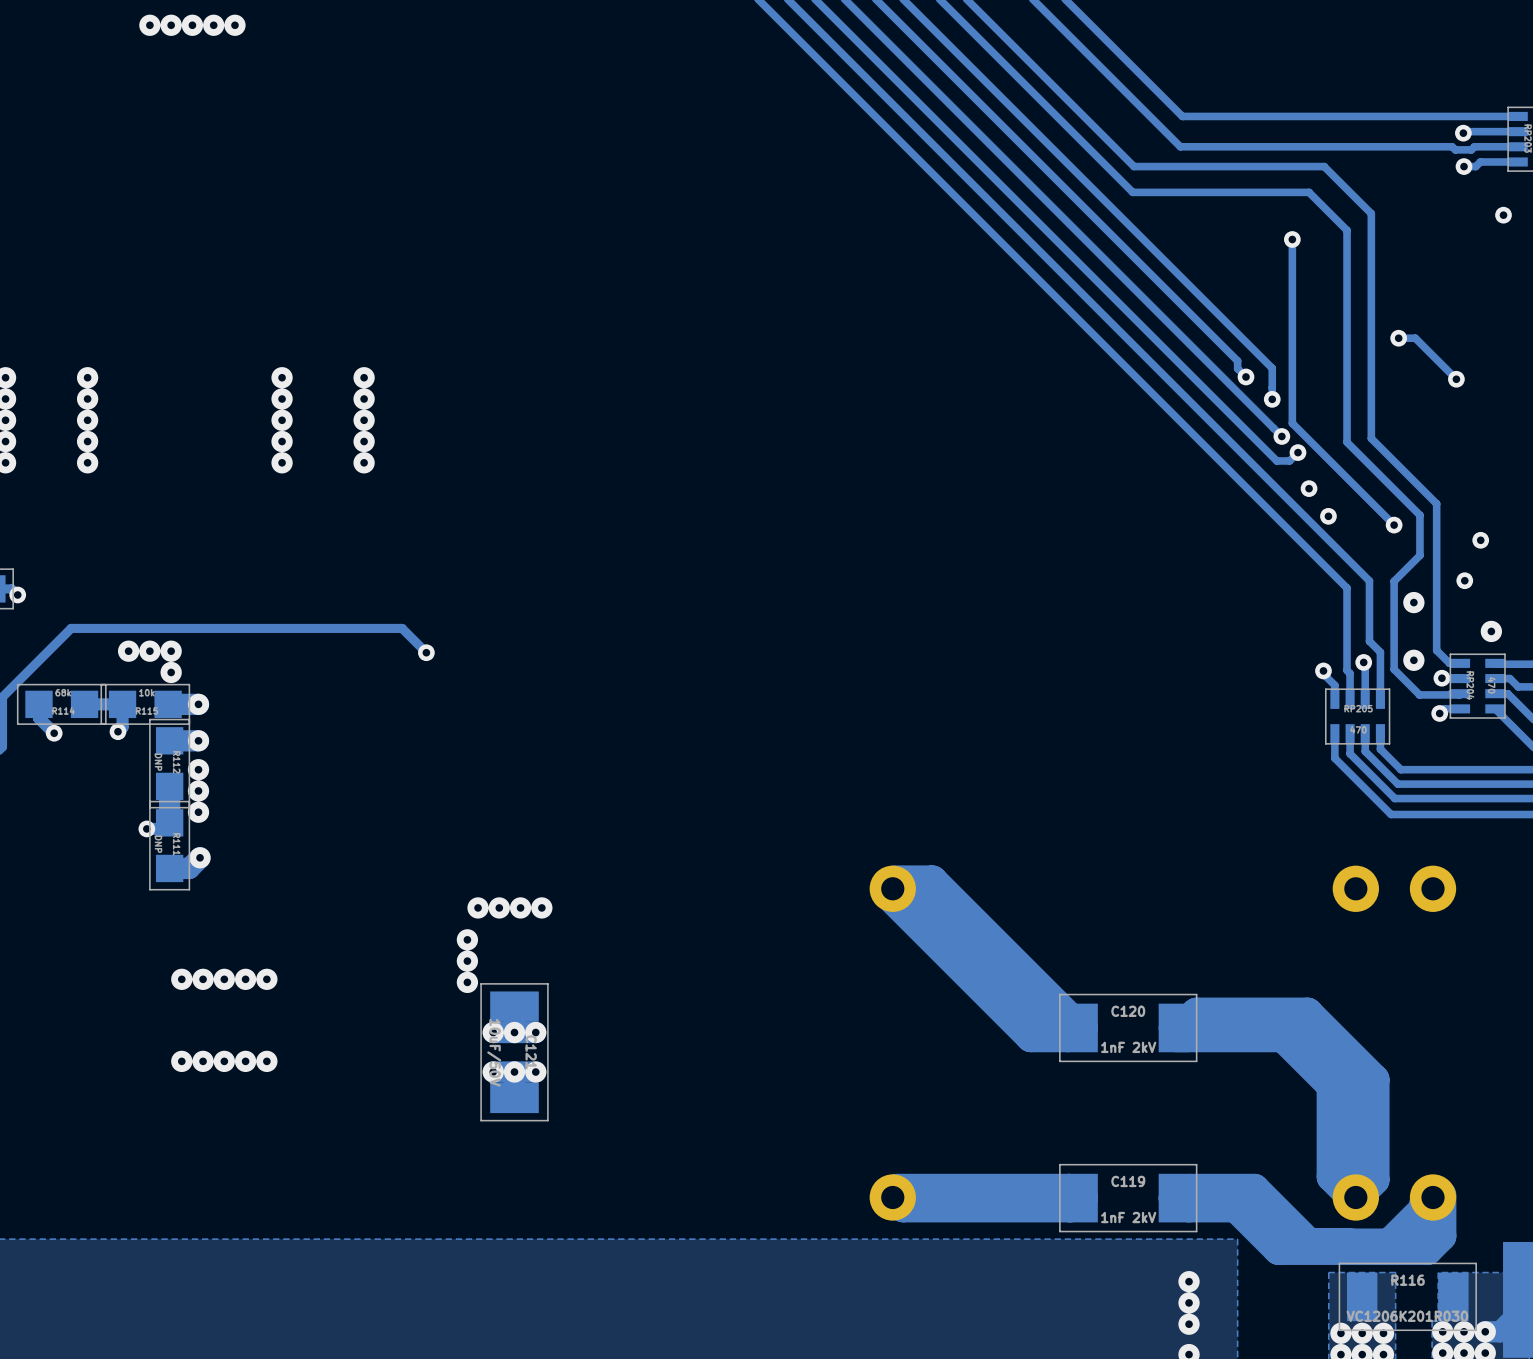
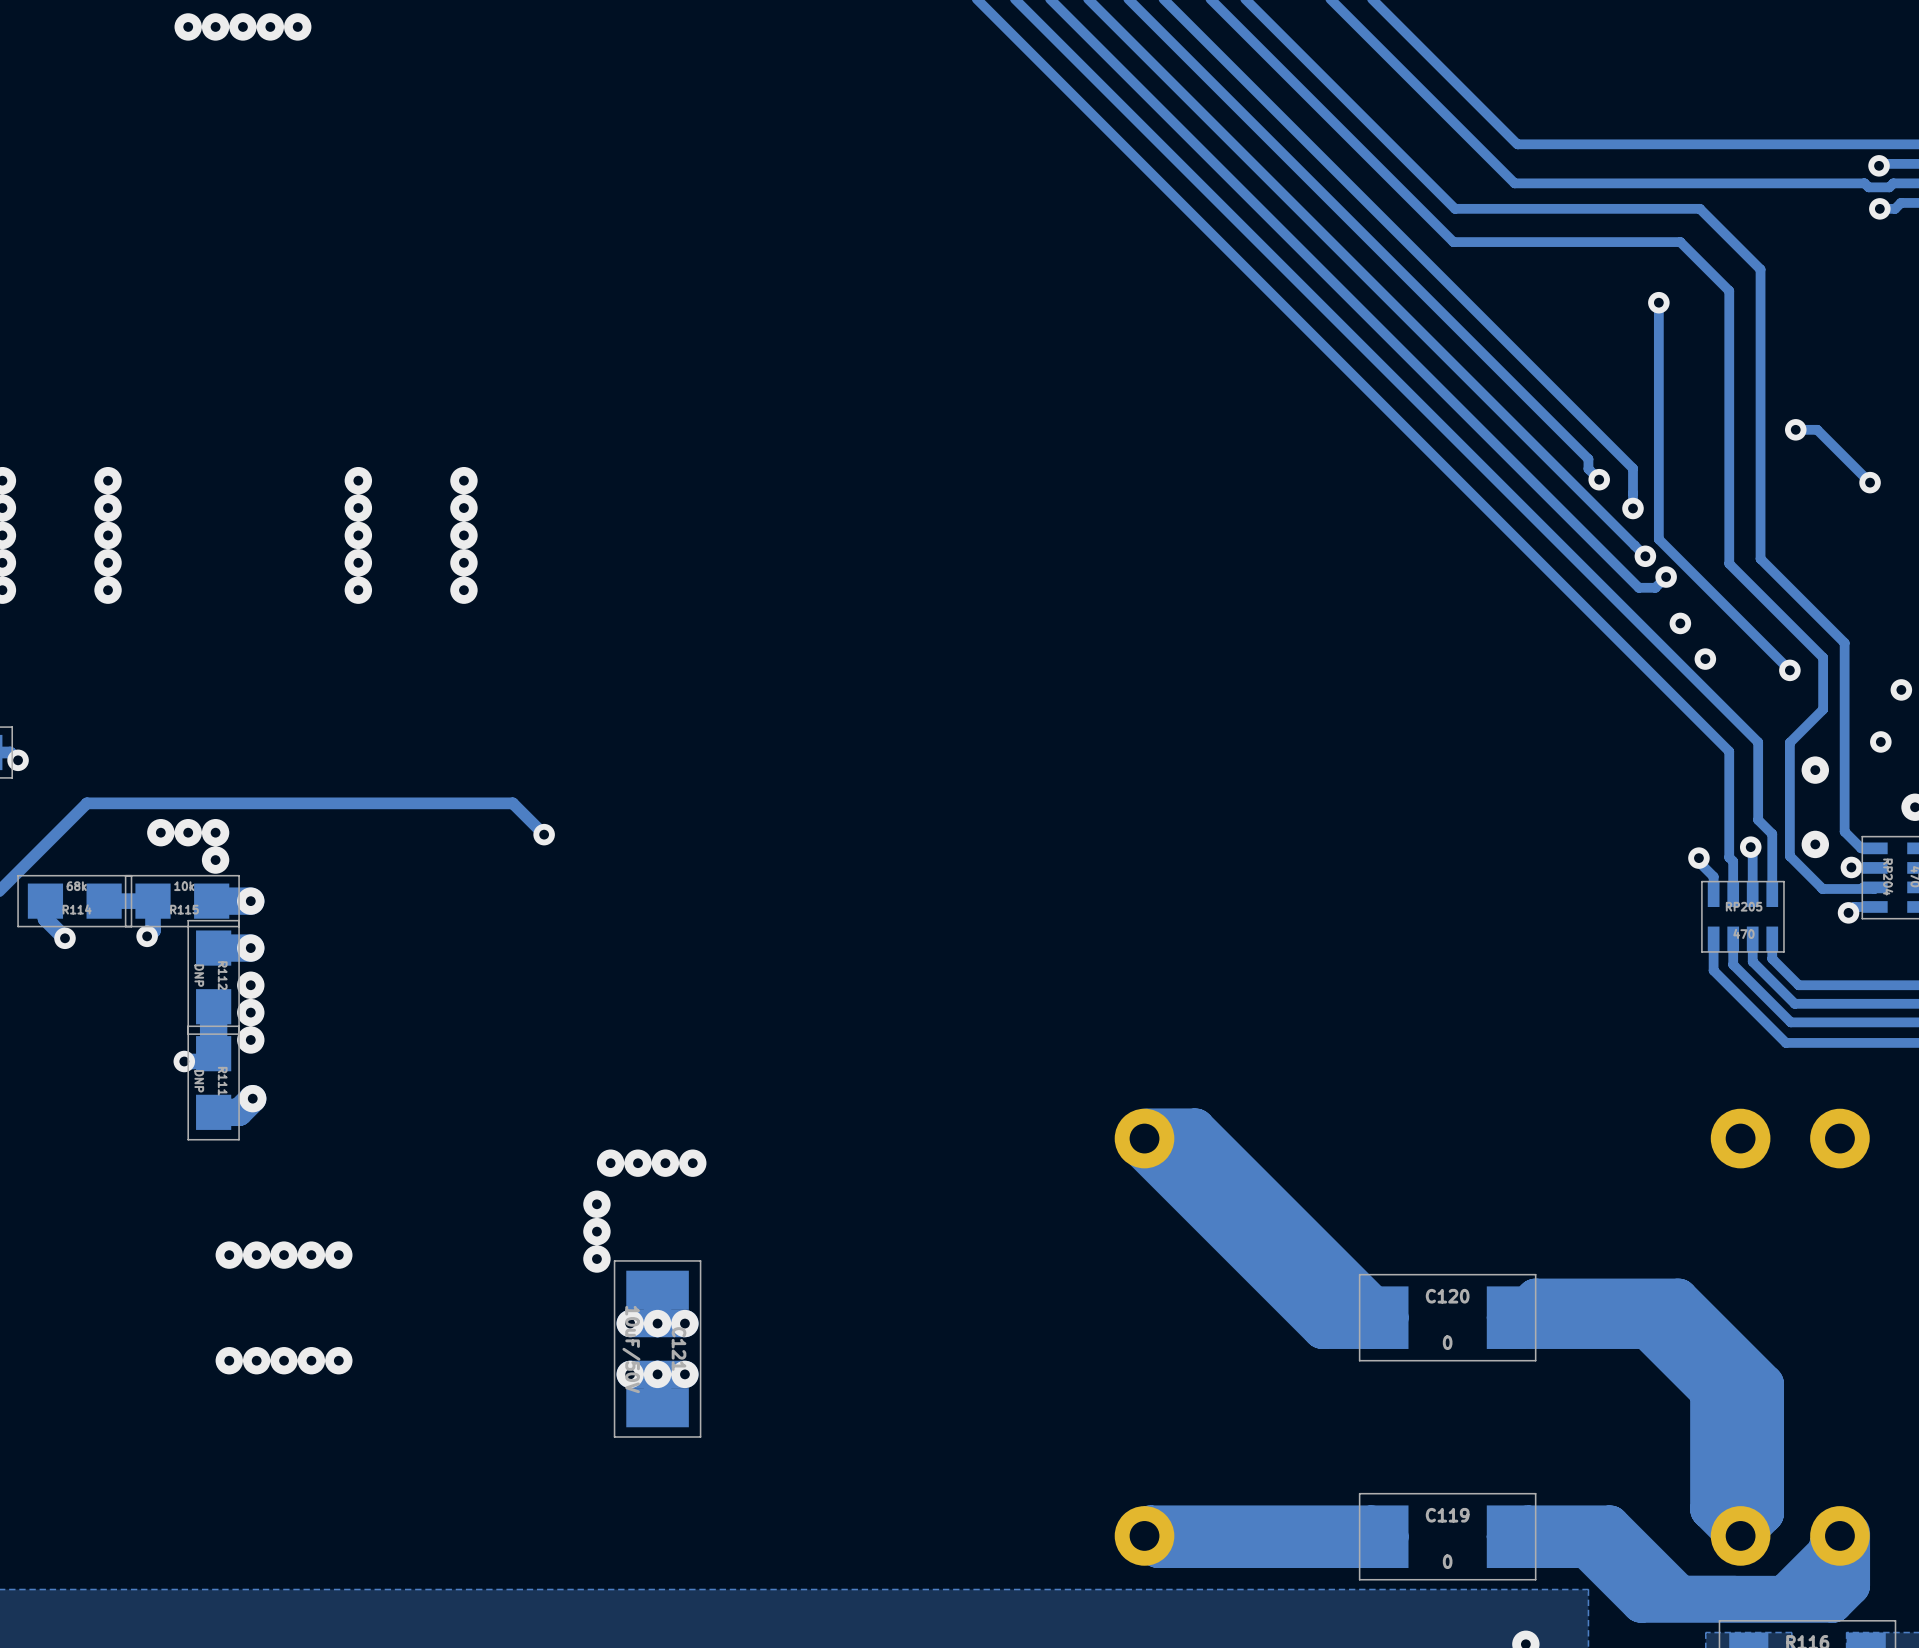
C120 value: 1nF 2kV (1128, 1047) -> 0 (1447, 1342)
C119 value: 1nF 2kV (1128, 1217) -> 0 (1447, 1561)

